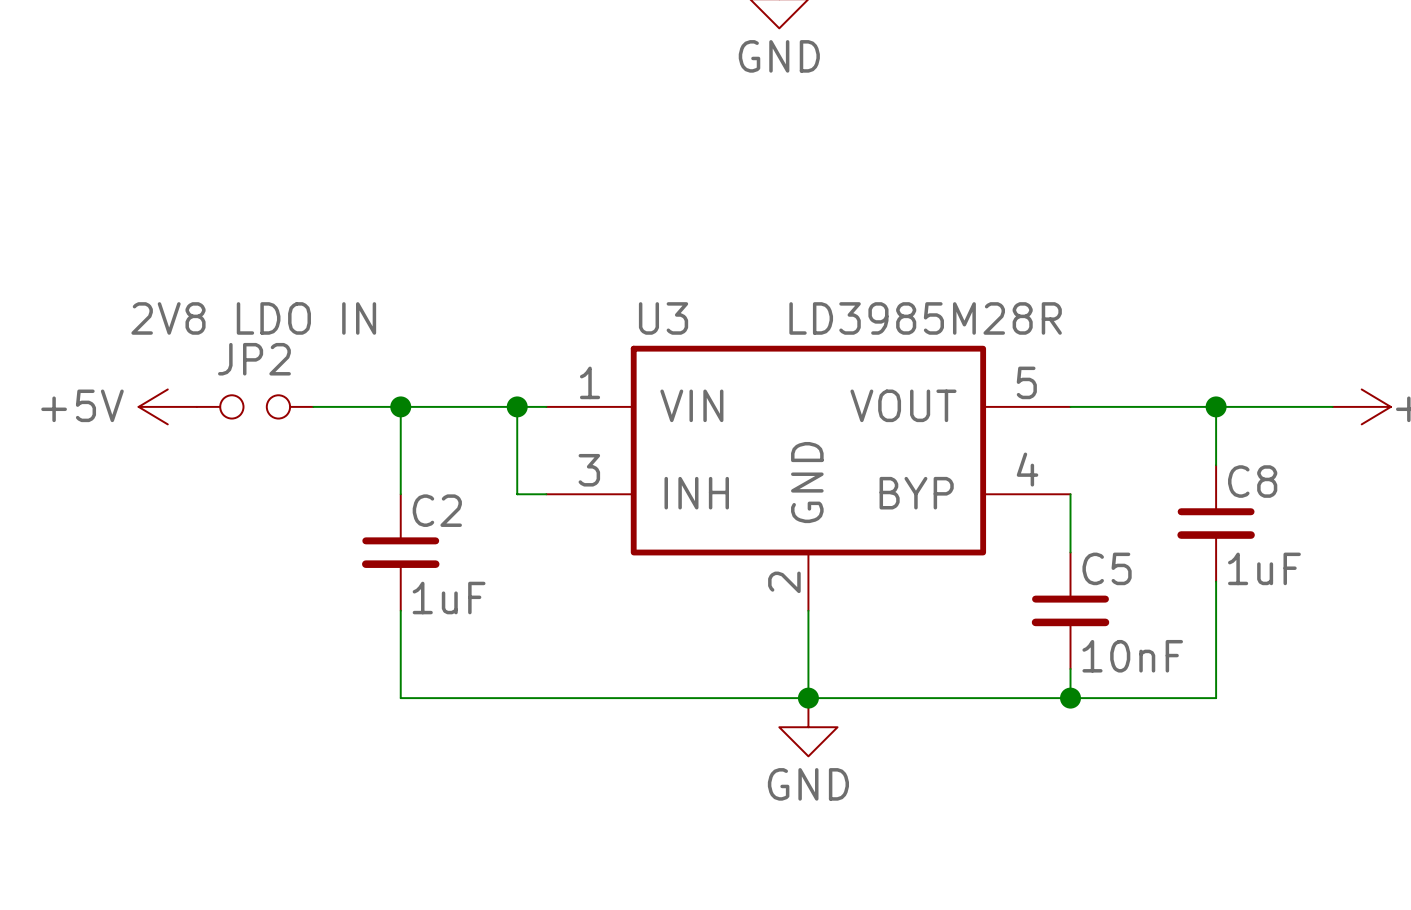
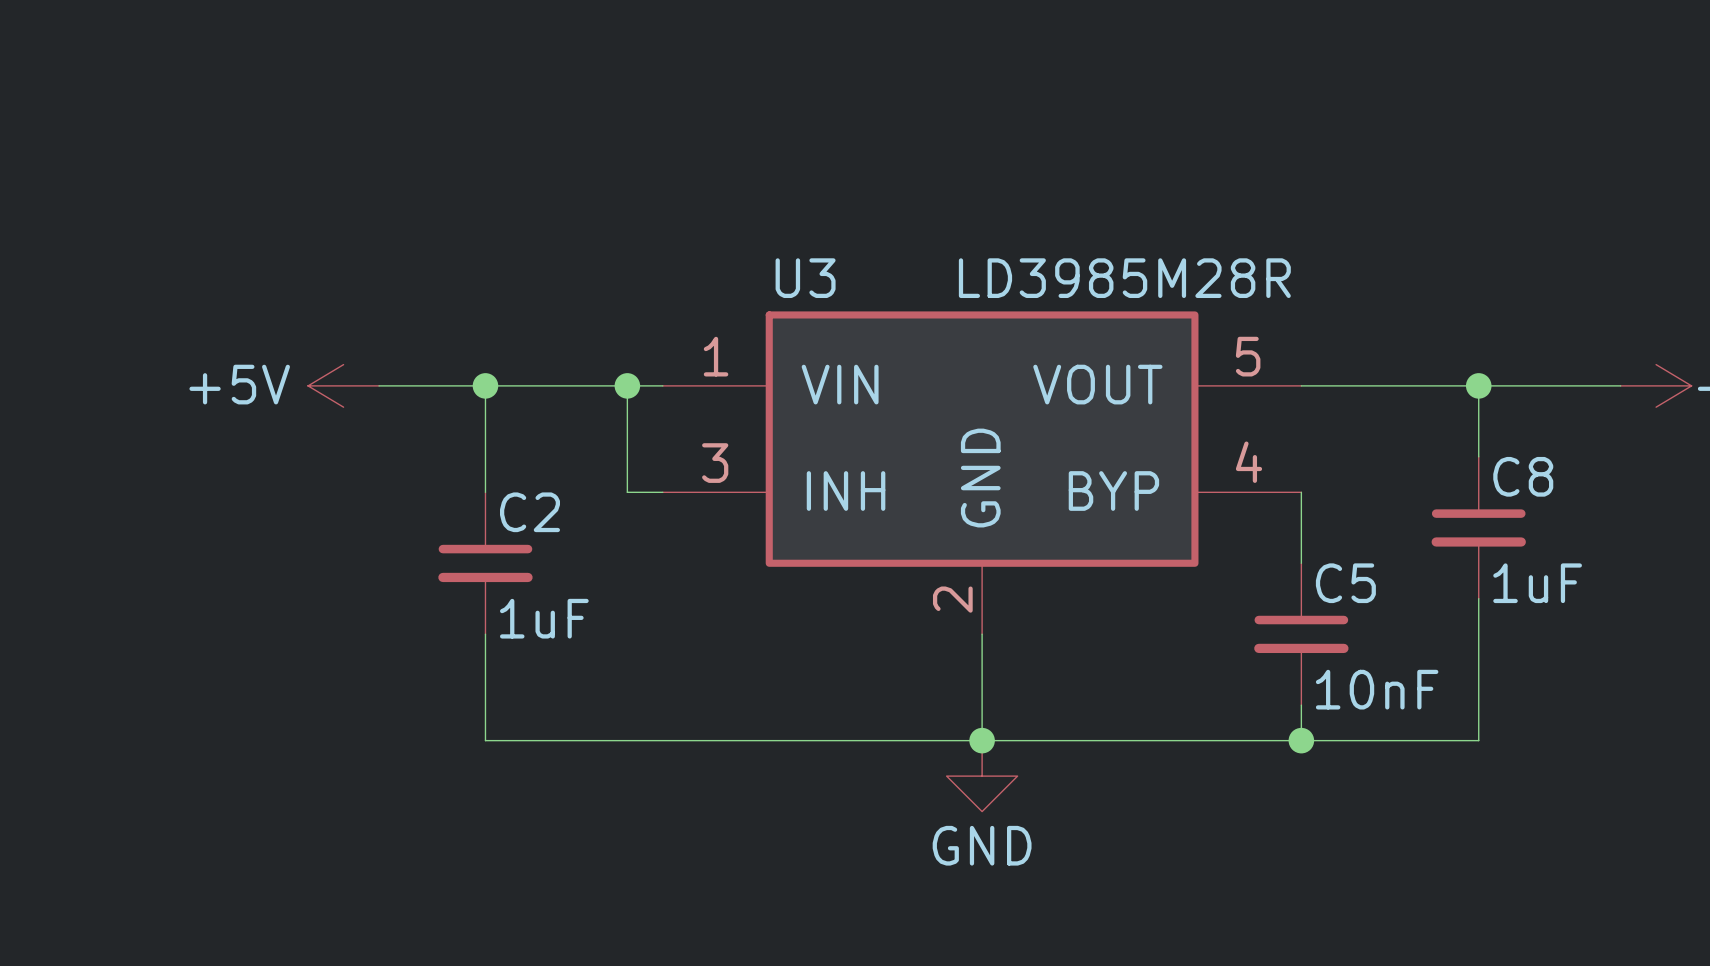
power symbol position: +5V (167, 406) -> +5V (343, 385)
JP2: 2V8 LDO IN (255, 406) -> none

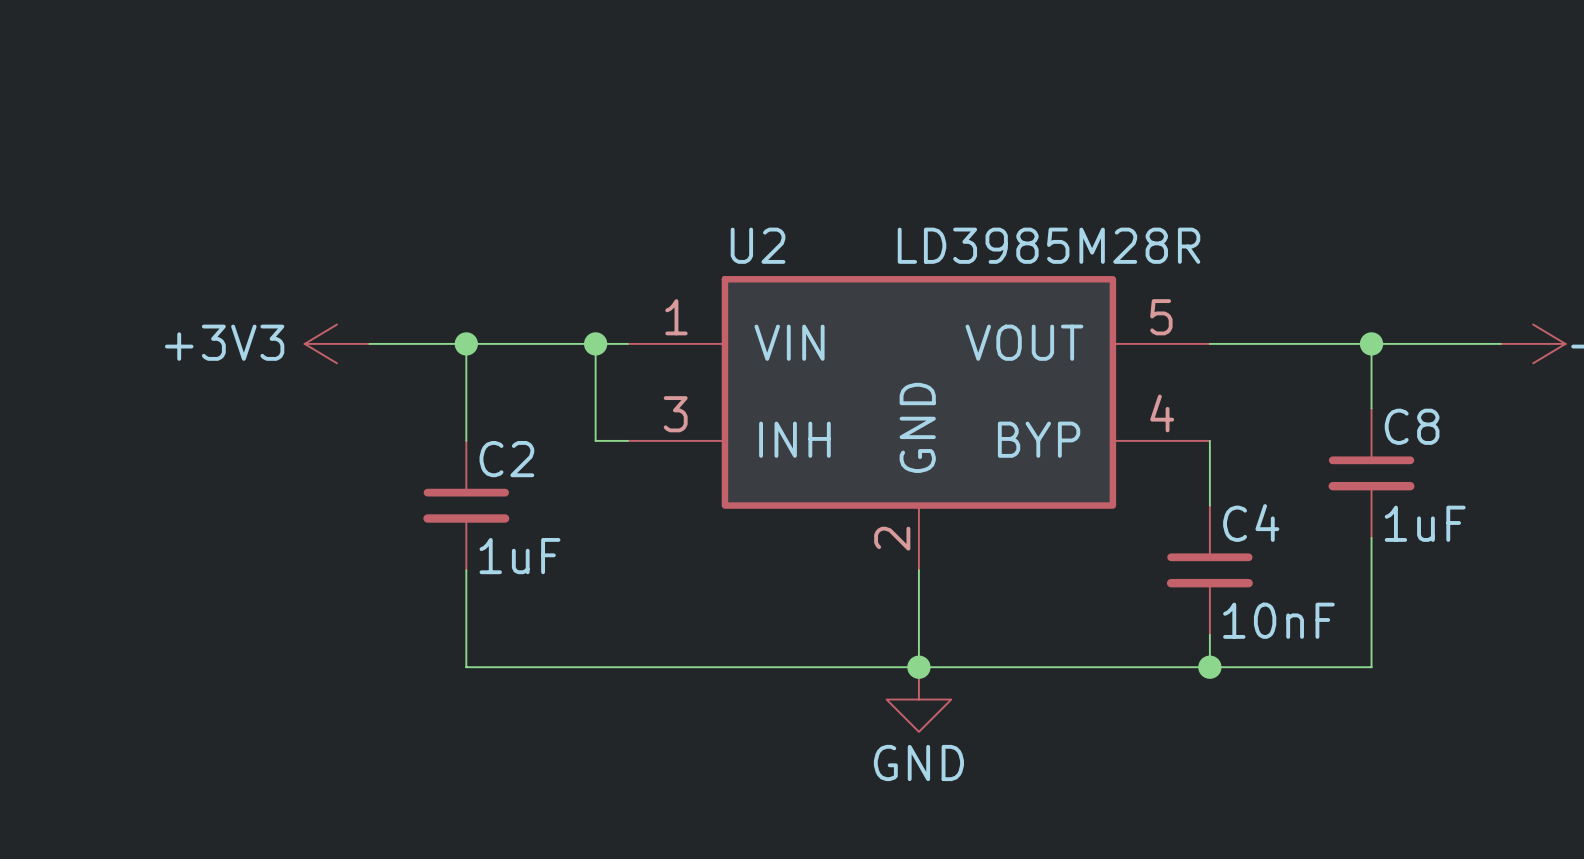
U3 name: U3 (805, 278) -> U2 (758, 245)
power symbol: +5V (343, 385) -> +3V3 (337, 343)
C5 name: C5 (1345, 583) -> C4 (1251, 522)

